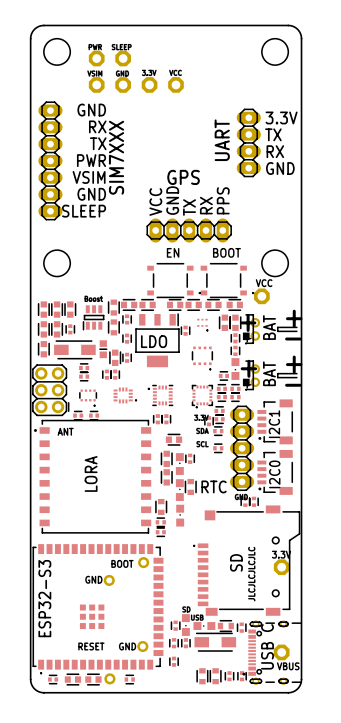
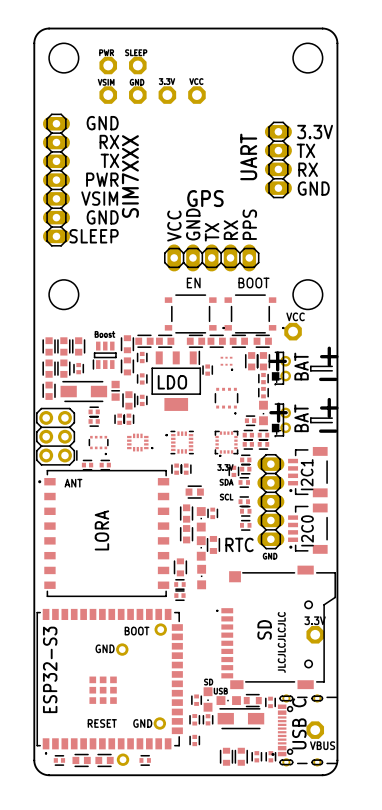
part: none -> (245, 511)
part: none -> (245, 525)
part: (245, 501) -> none
part: (253, 501) -> none

